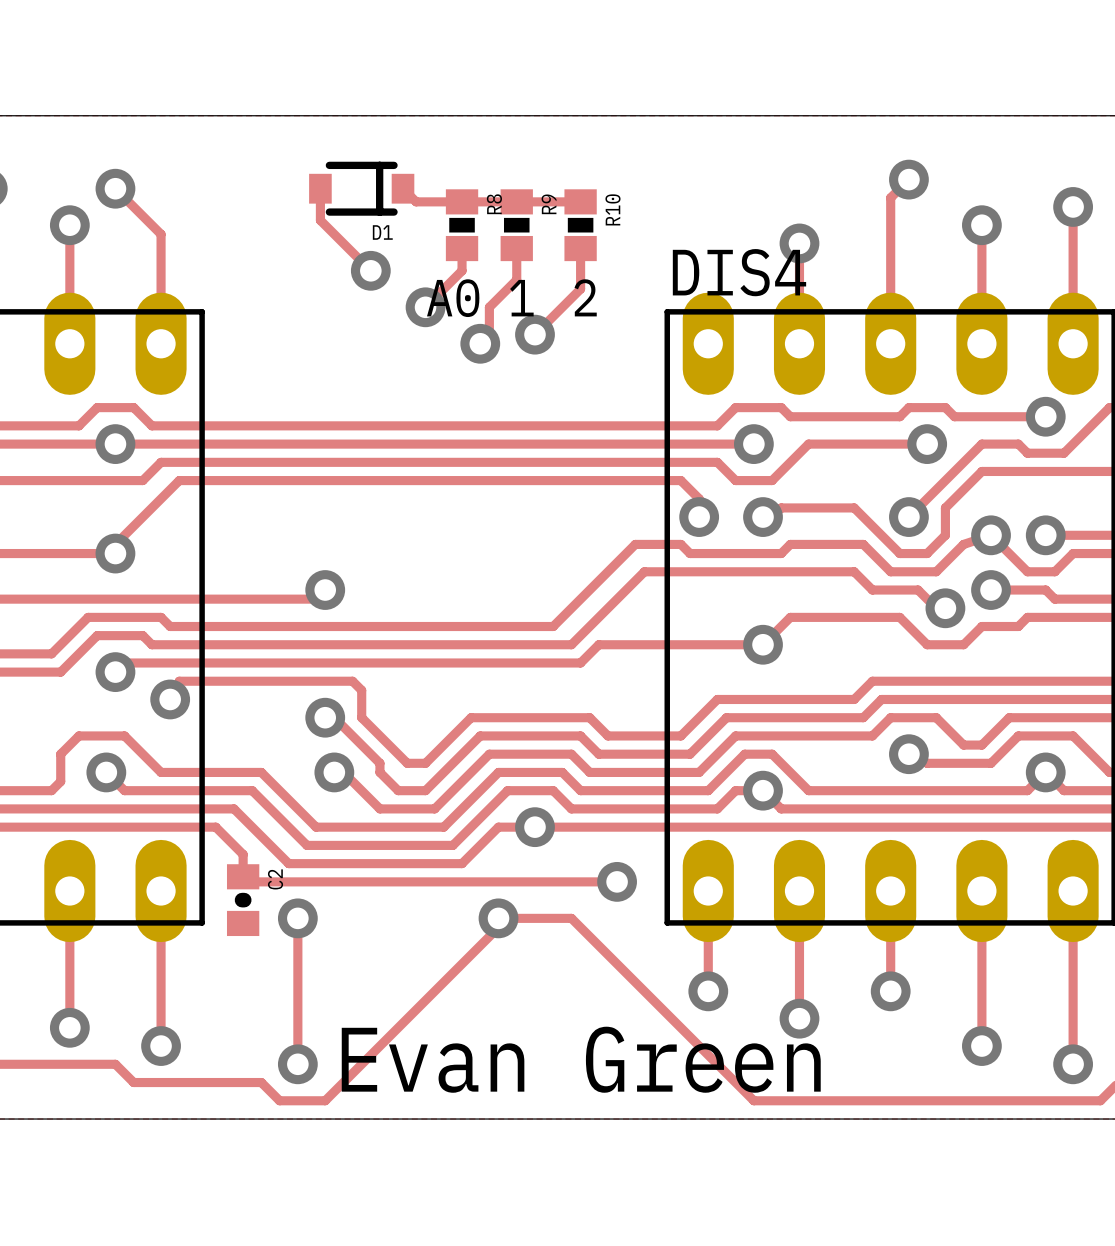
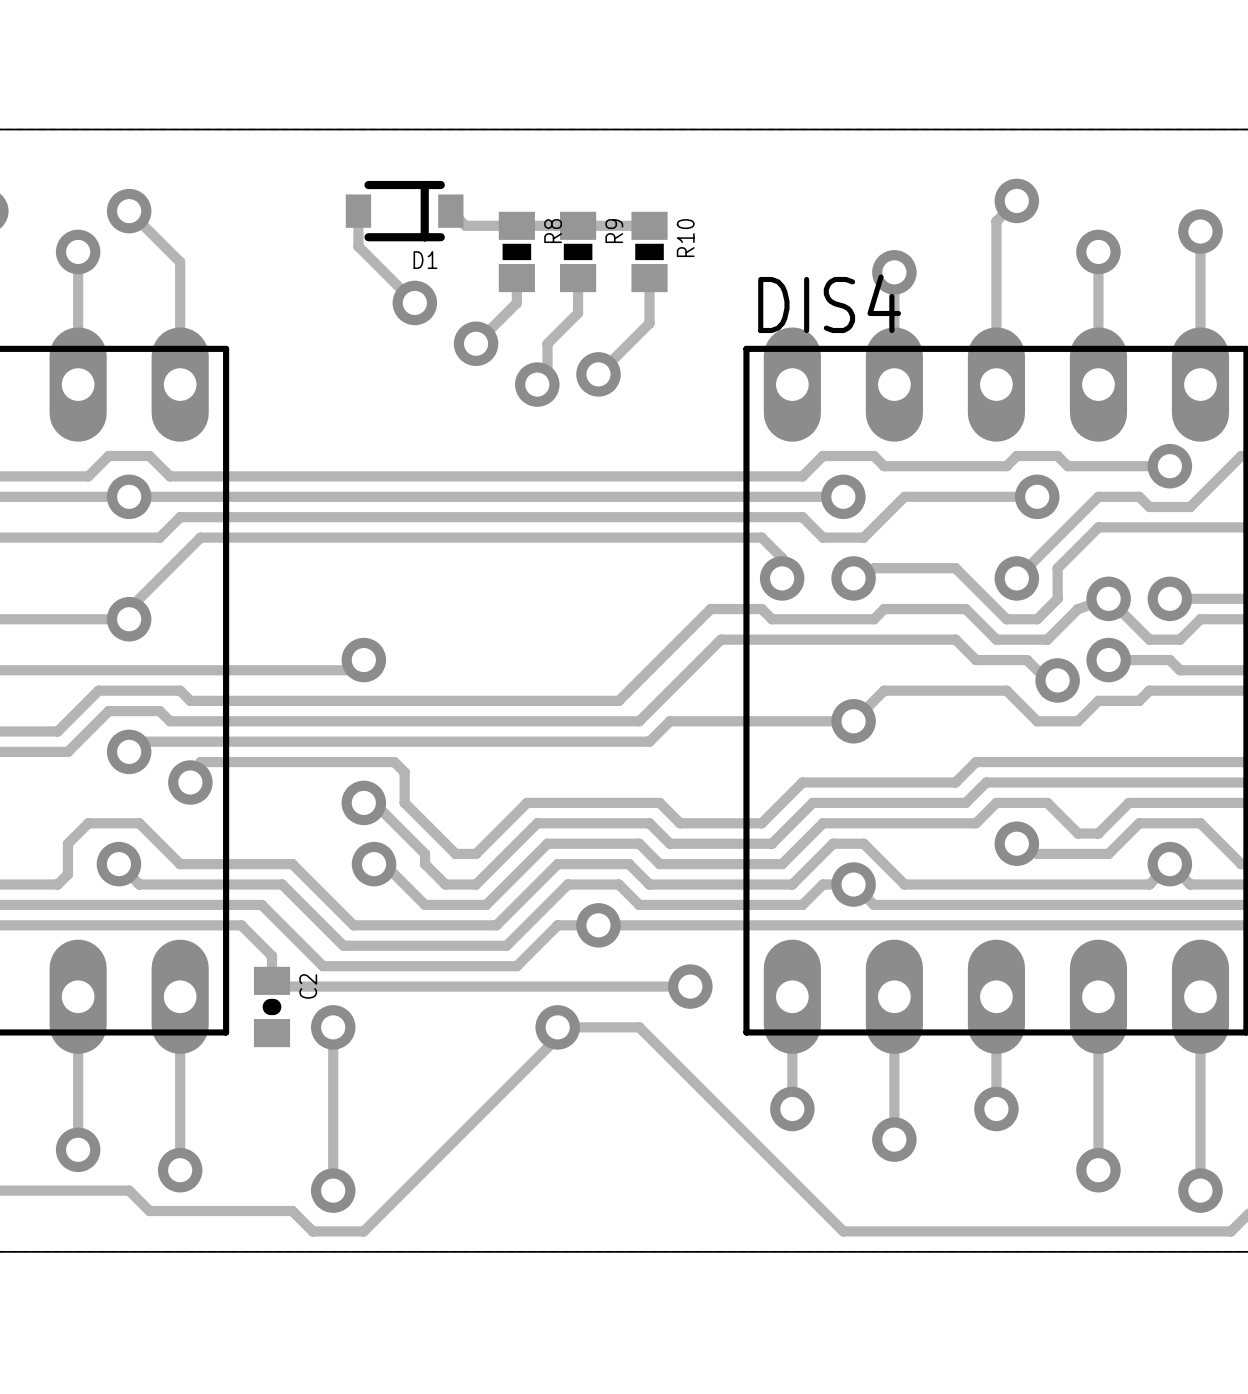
text: 2 (585, 297) -> none
text: A0 (453, 298) -> none
text: 1 (521, 298) -> none
text: Evan Green (581, 1059) -> none

